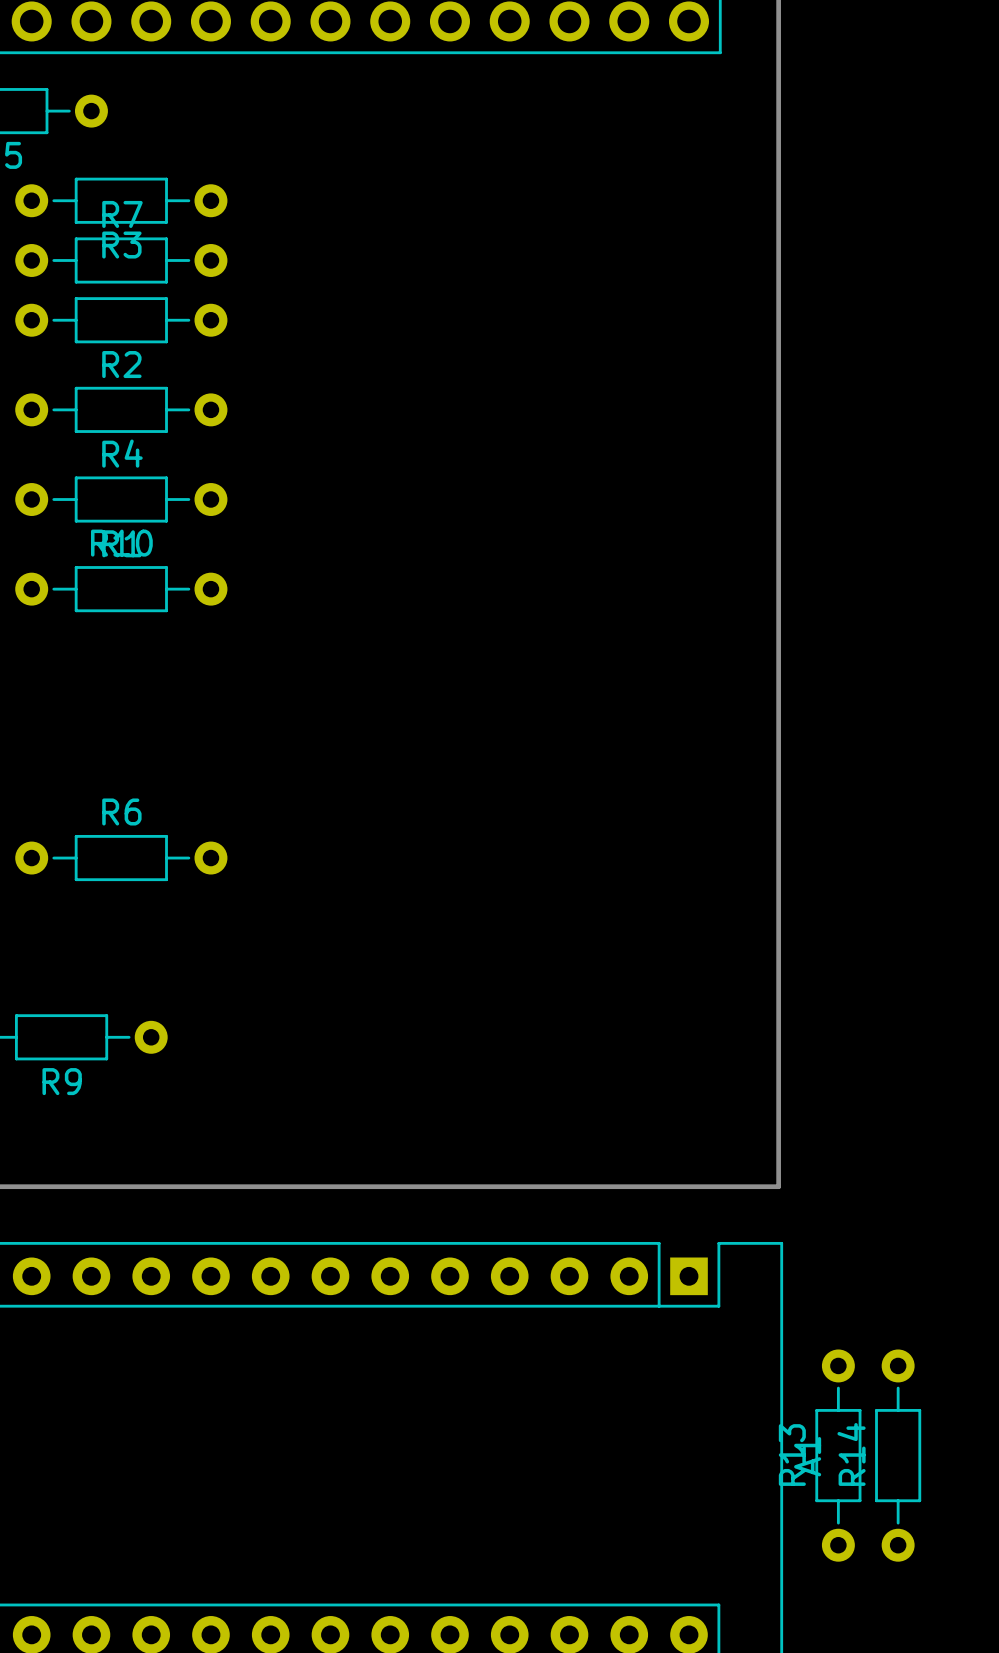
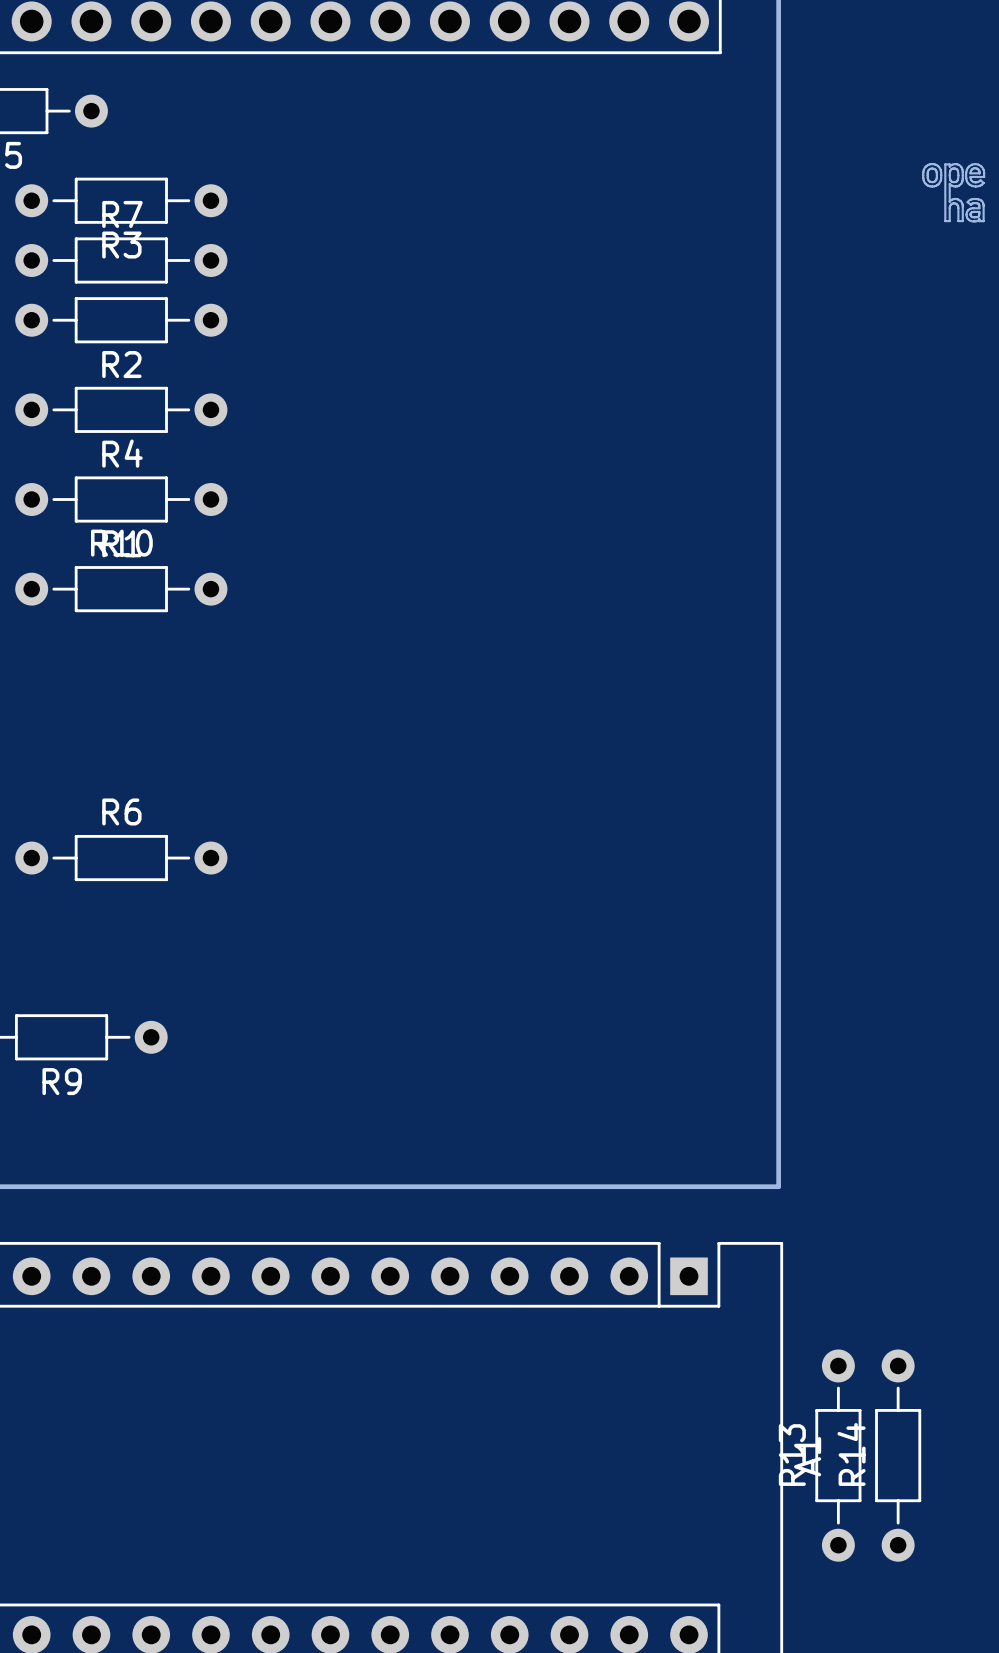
line: none -> (932, 164) (939, 167) (941, 175) (939, 183) (932, 186) (925, 183) (923, 175) (925, 167) (932, 164)
line: none -> (975, 164) (981, 166) (984, 172) (984, 176) (970, 176) (973, 181) (980, 180) (983, 182) (976, 186) (968, 184) (966, 176) (968, 167) (975, 164)
line: none -> (932, 168) (928, 170) (927, 175) (928, 180) (932, 182) (935, 180) (936, 175) (935, 170) (932, 168)
line: none -> (954, 168) (950, 169) (949, 175) (950, 180) (954, 182) (957, 180) (958, 175) (957, 169) (954, 168)
line: none -> (975, 168) (971, 169) (970, 173) (979, 173) (978, 169) (976, 168) (976, 168) (975, 168) (975, 168)
line: none -> (972, 199) (967, 202) (970, 204) (977, 203) (979, 208) (968, 209) (967, 217) (972, 221) (979, 219) (979, 221) (983, 221) (982, 202) (979, 199) (972, 199)
line: none -> (949, 201) (949, 183) (957, 186) (962, 180) (962, 168) (957, 164) (949, 166) (949, 164) (945, 164) (945, 221) (949, 221) (949, 206) (954, 203) (958, 206) (958, 221) (962, 221) (961, 201) (955, 198) (949, 201)
line: none -> (974, 211) (979, 211) (978, 216) (971, 216) (970, 213) (974, 211)

